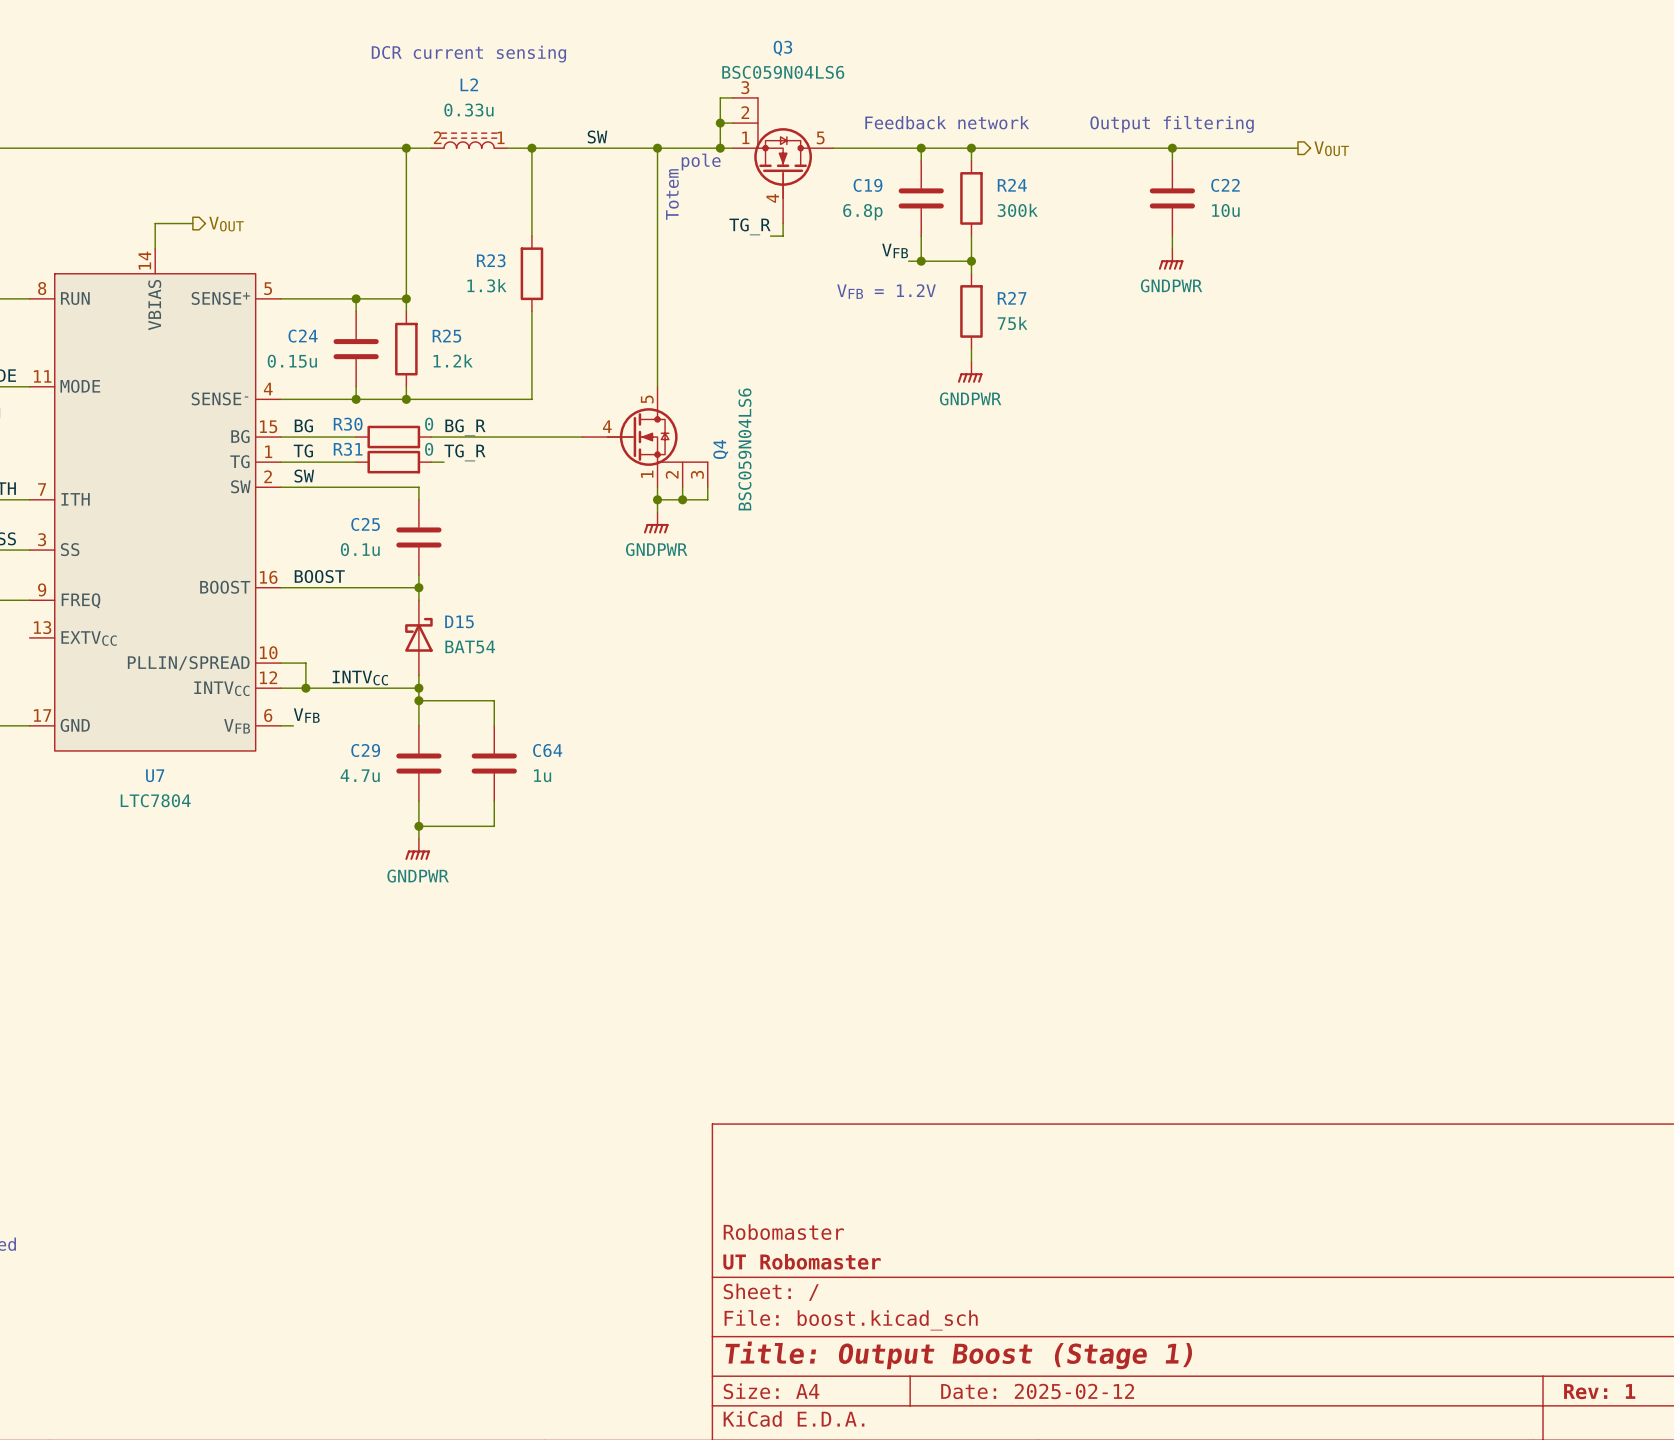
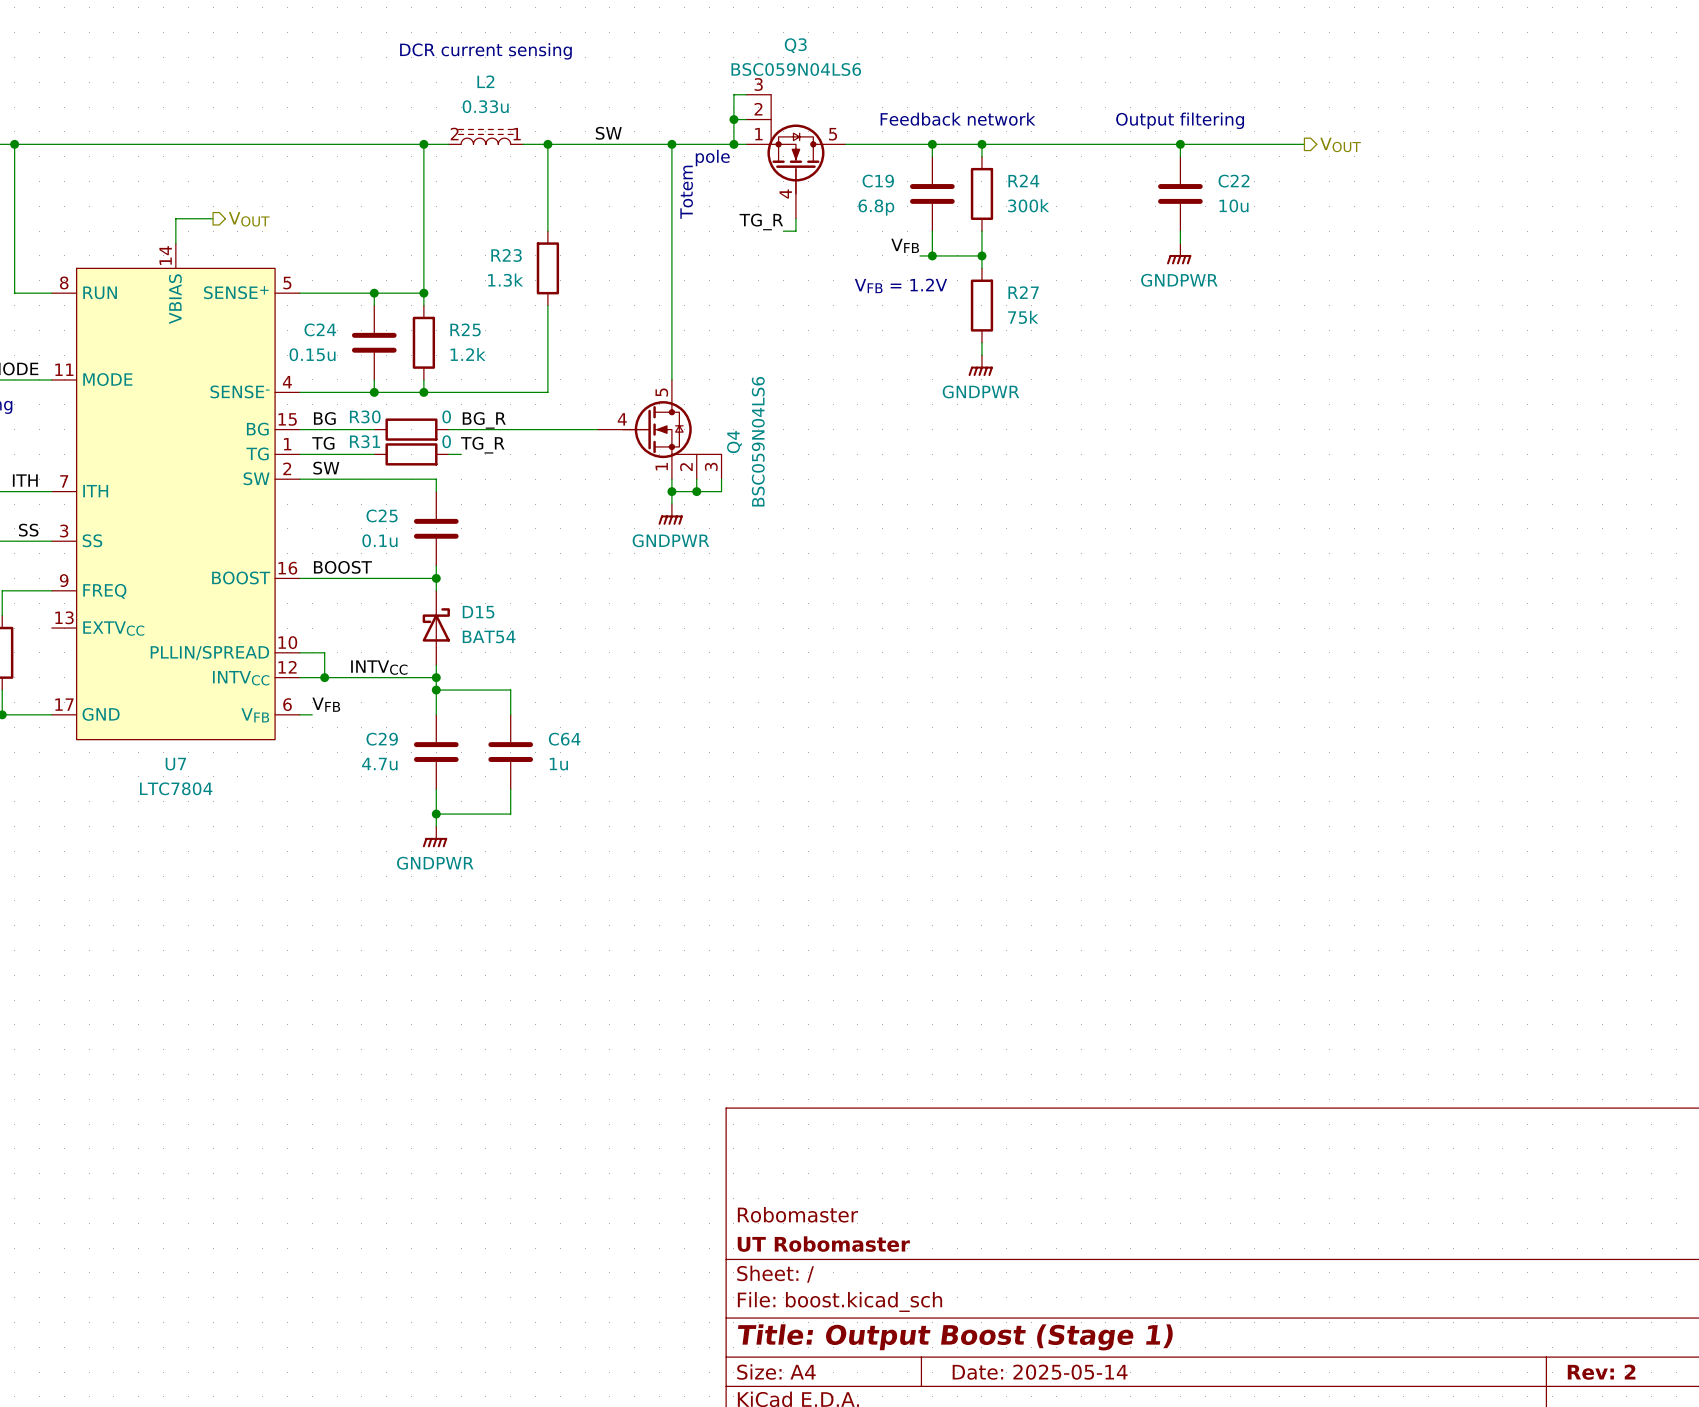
title block: Date: 2025-02-12 (1037, 1391) -> Date: 2025-05-14 (1040, 1372)
title block: Rev: 1 (1599, 1391) -> Rev: 2 (1601, 1372)

